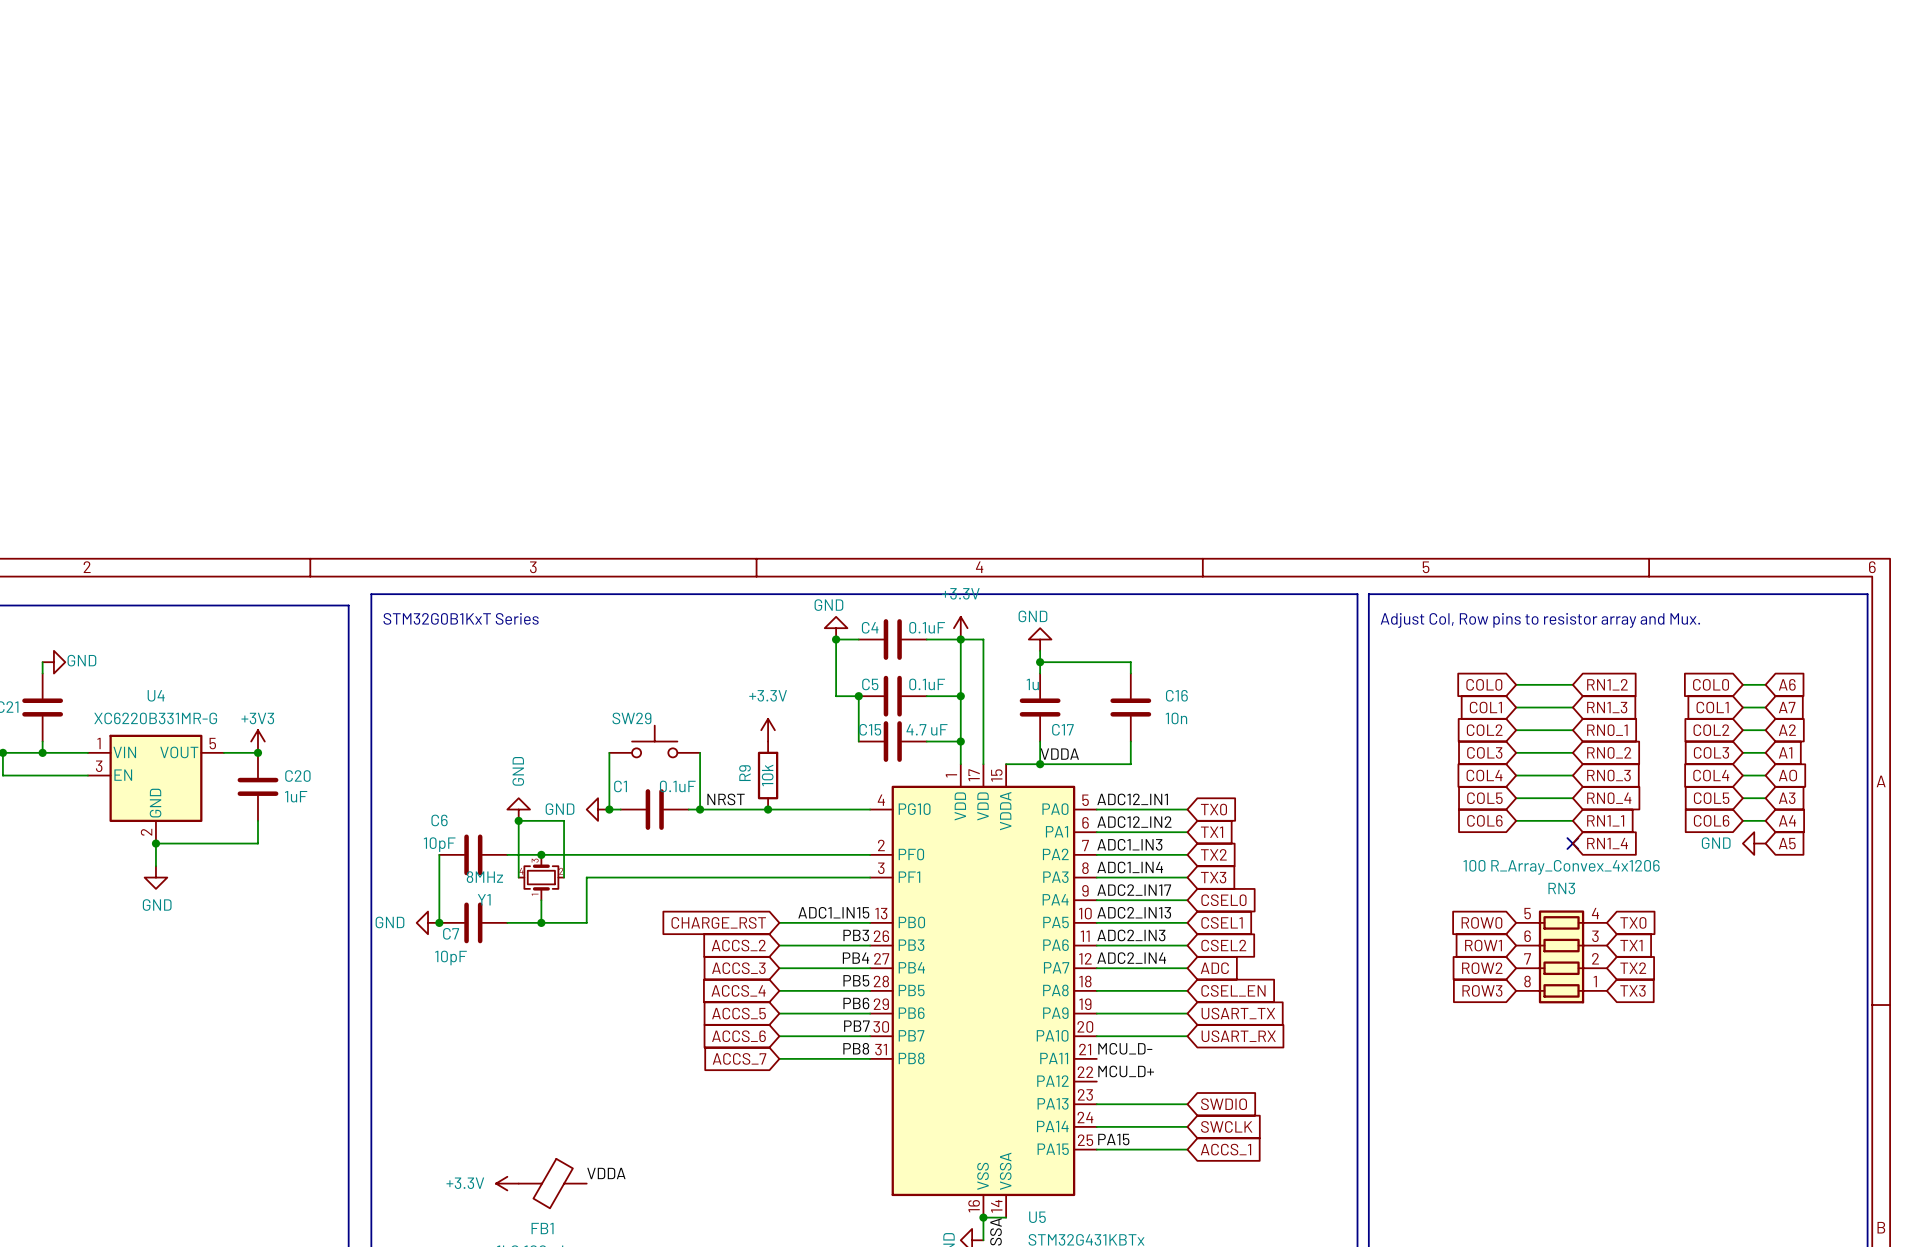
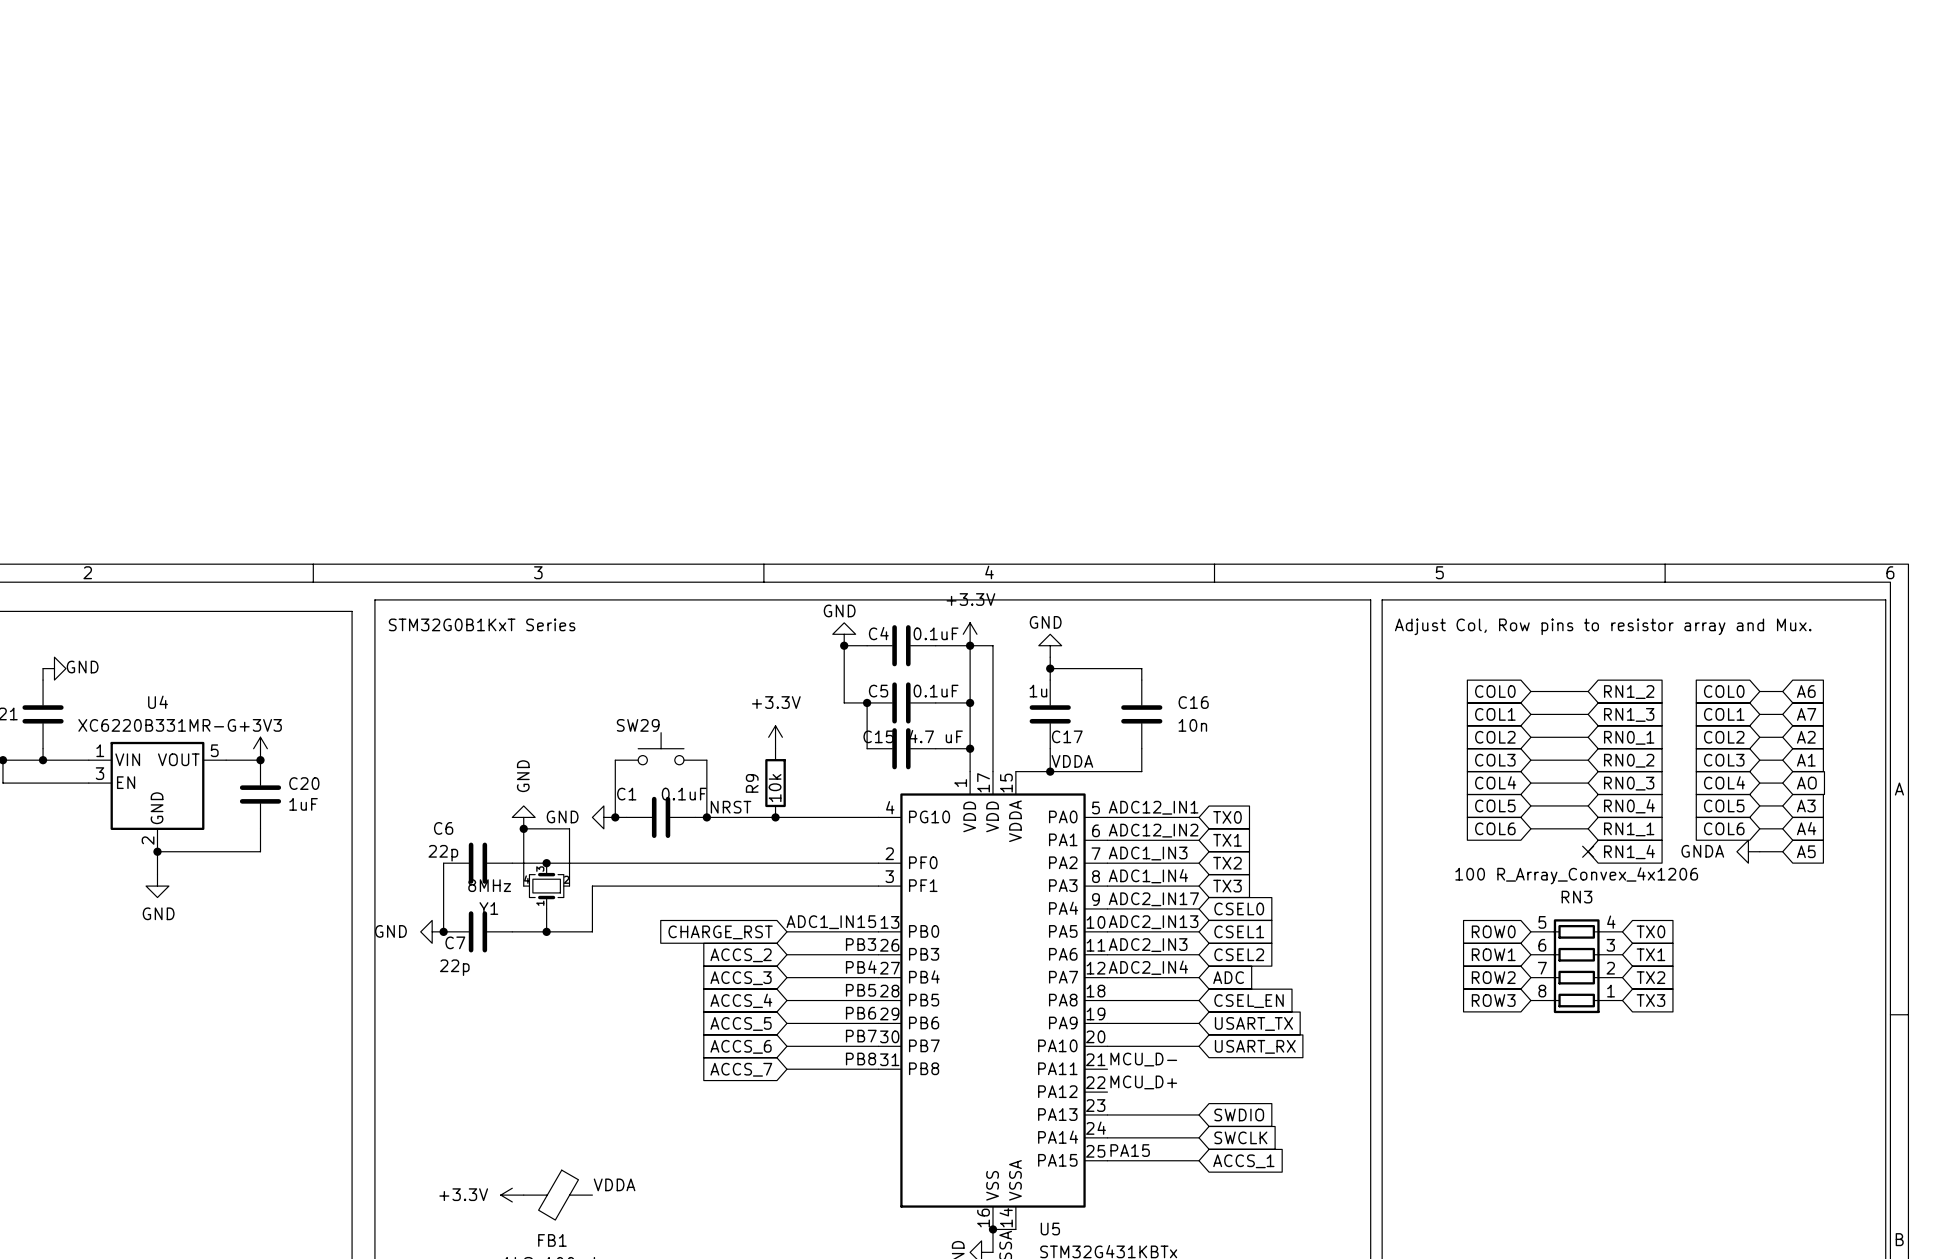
power symbol: none -> GNDA (1748, 851)
power symbol: GND (1754, 843) -> none
C6 value: 10pF (439, 844) -> 22p (443, 853)
C7 value: 10pF (450, 957) -> 22p (454, 967)

